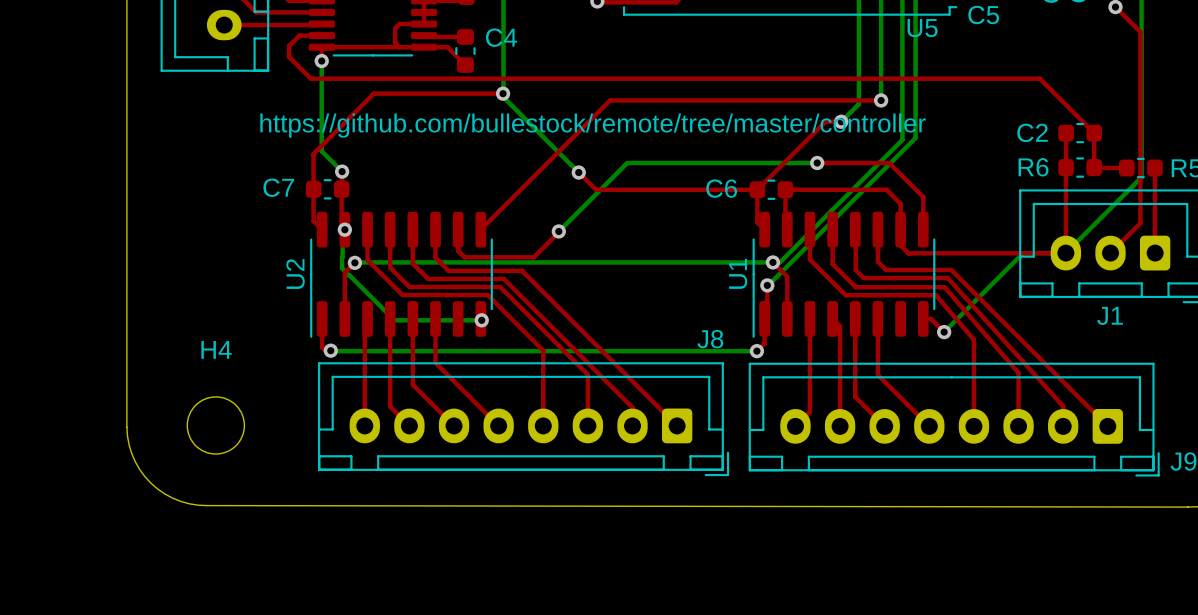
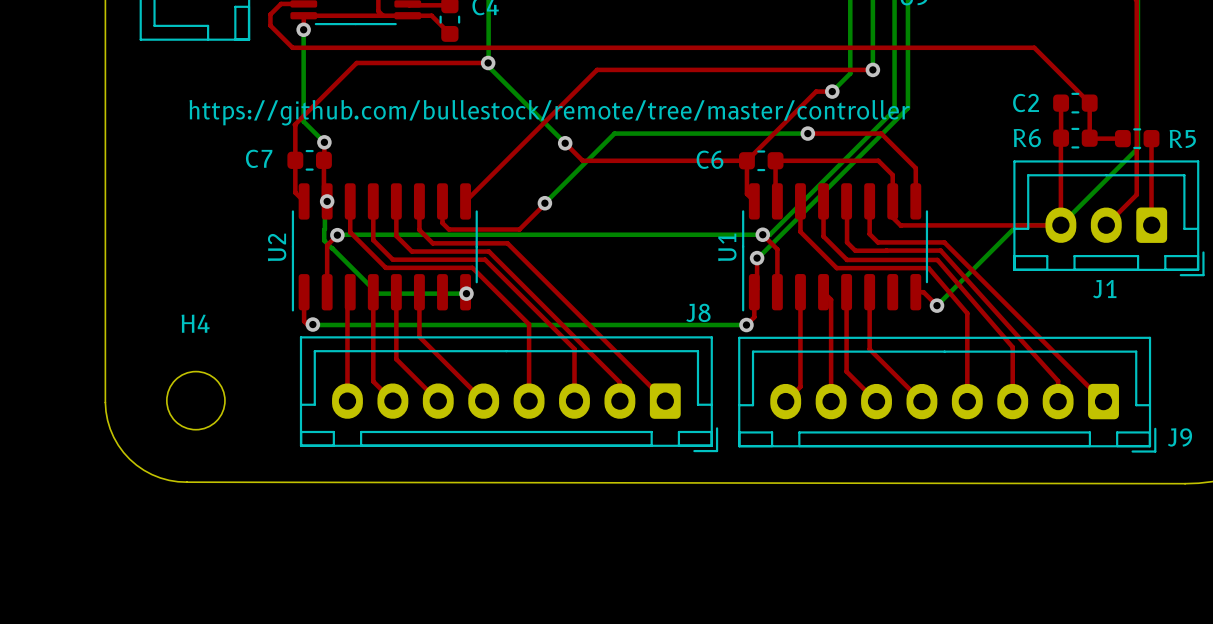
text position: https://github.com/bullestock/remote/tree/master/controller (593, 125) -> https://github.com/bullestock/remote/tree/master/controller (549, 112)

